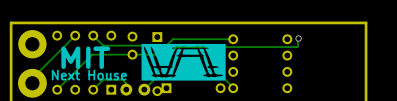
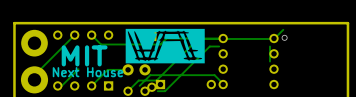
track: none -> (283, 29) (274, 38) (198, 38) (156, 80) (138, 80) (128, 91)
track: (298, 38) (297, 47) (176, 47) (168, 54) (92, 54) (57, 89) -> (78, 69) (61, 85) (57, 85)
part rotation: 0° (132, 45) -> 90° clockwise (136, 91)
part position: (132, 45) -> (136, 91)
track: none -> (219, 46) (209, 46) (165, 91) (157, 91)
track: none -> (270, 46) (270, 61)
drawing position: (183, 62) -> (165, 46)
track: (103, 79) (122, 79) (126, 83) (126, 89) -> (101, 76) (107, 69) (128, 69)
part position: (135, 89) -> (136, 69)

